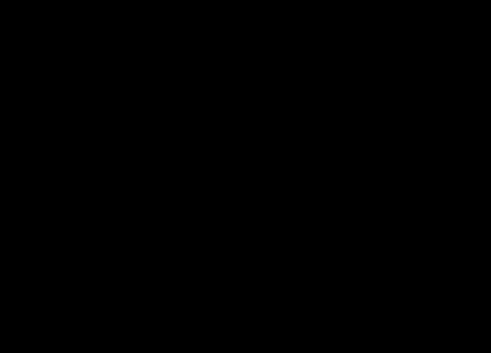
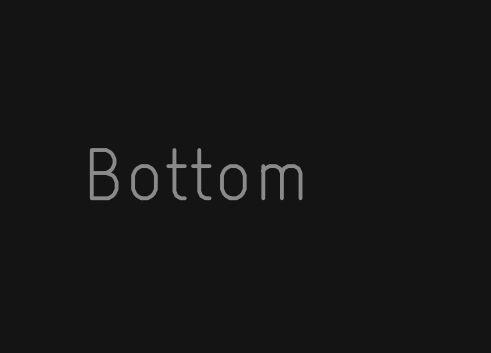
text: none -> Bottom (196, 174)

